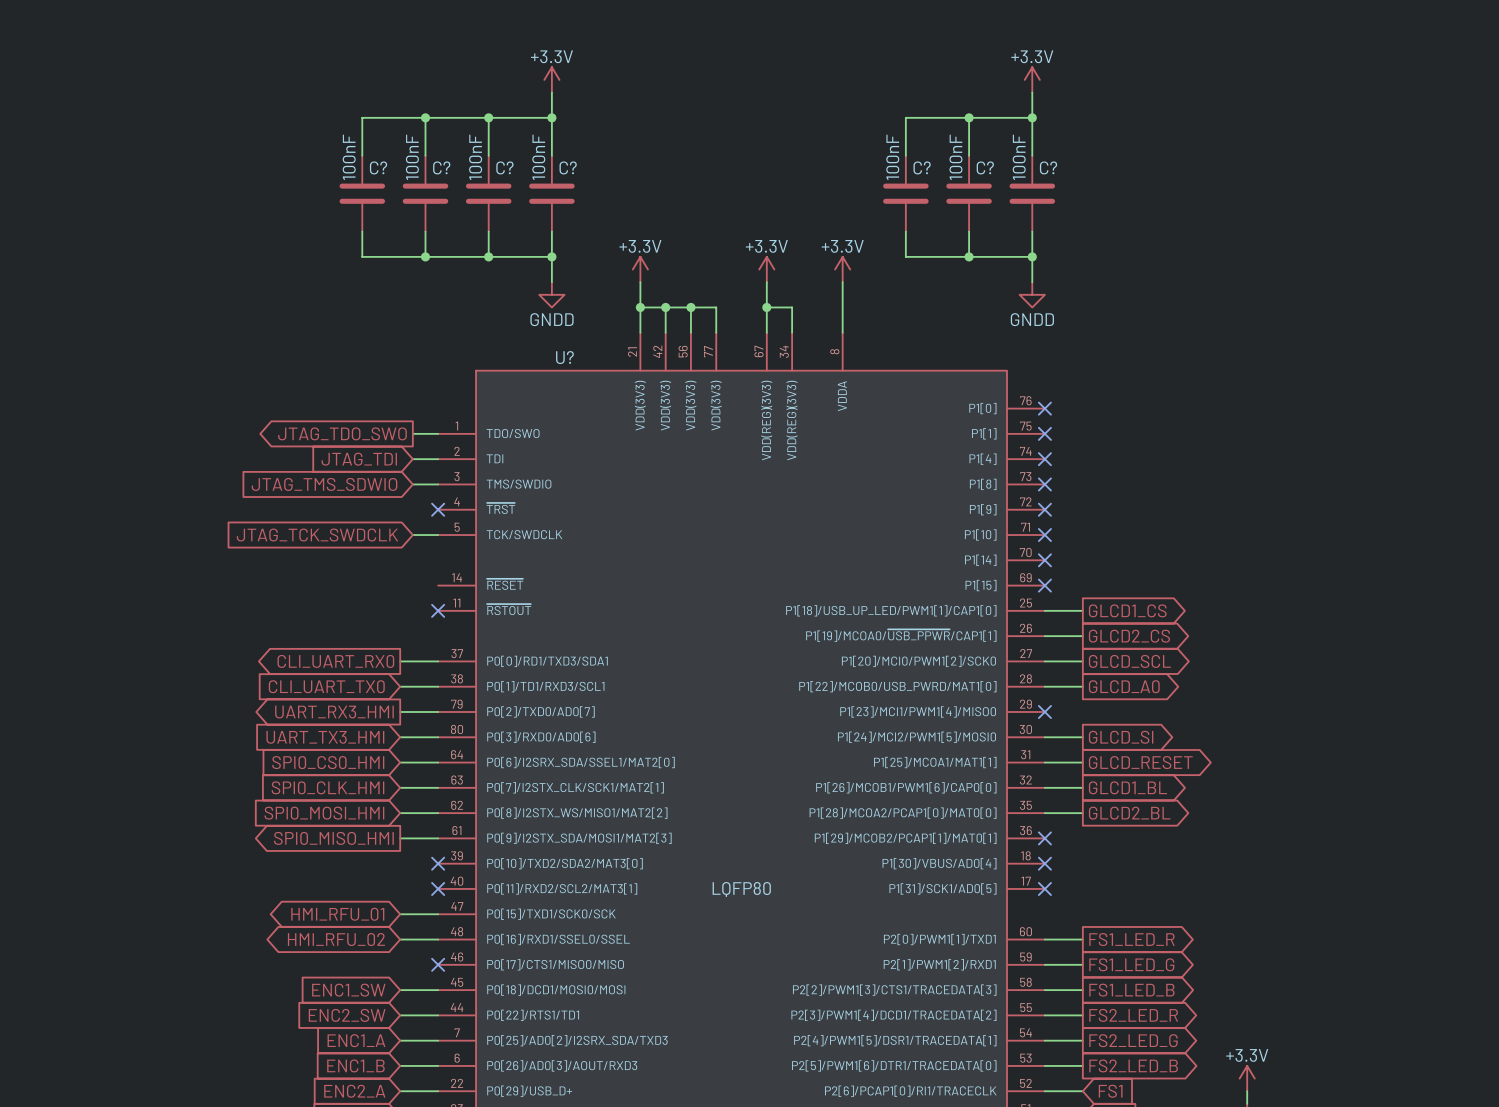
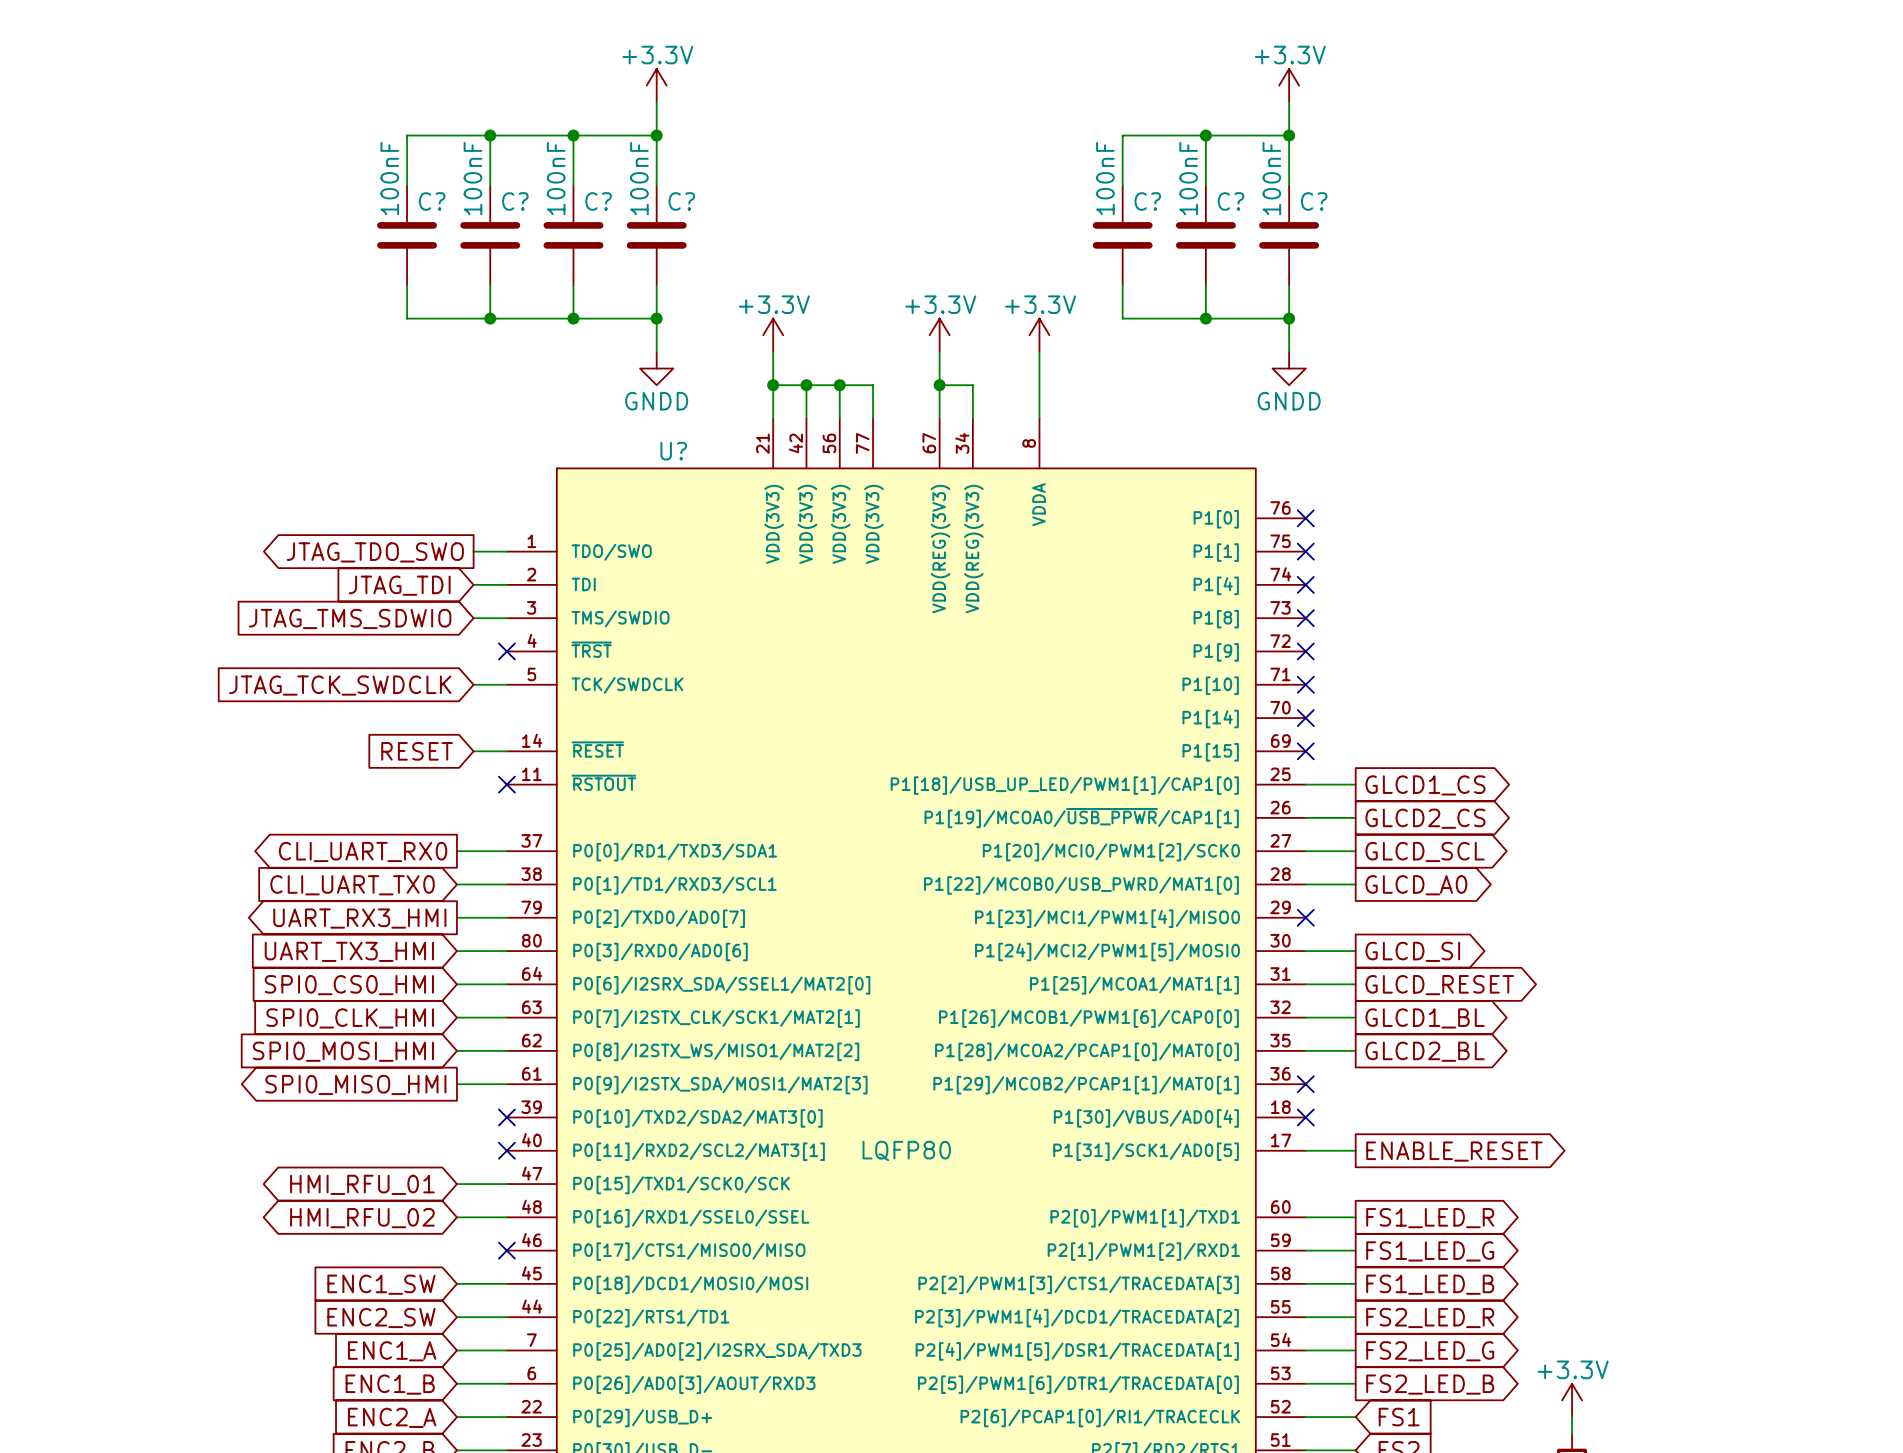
global label: none -> RESET (417, 751)
wire: none -> (473, 751) (506, 751)
wire: none -> (1305, 1150) (1355, 1150)
no-connect mark: (1044, 888) -> none
global label: none -> ENABLE_RESET (1454, 1151)

